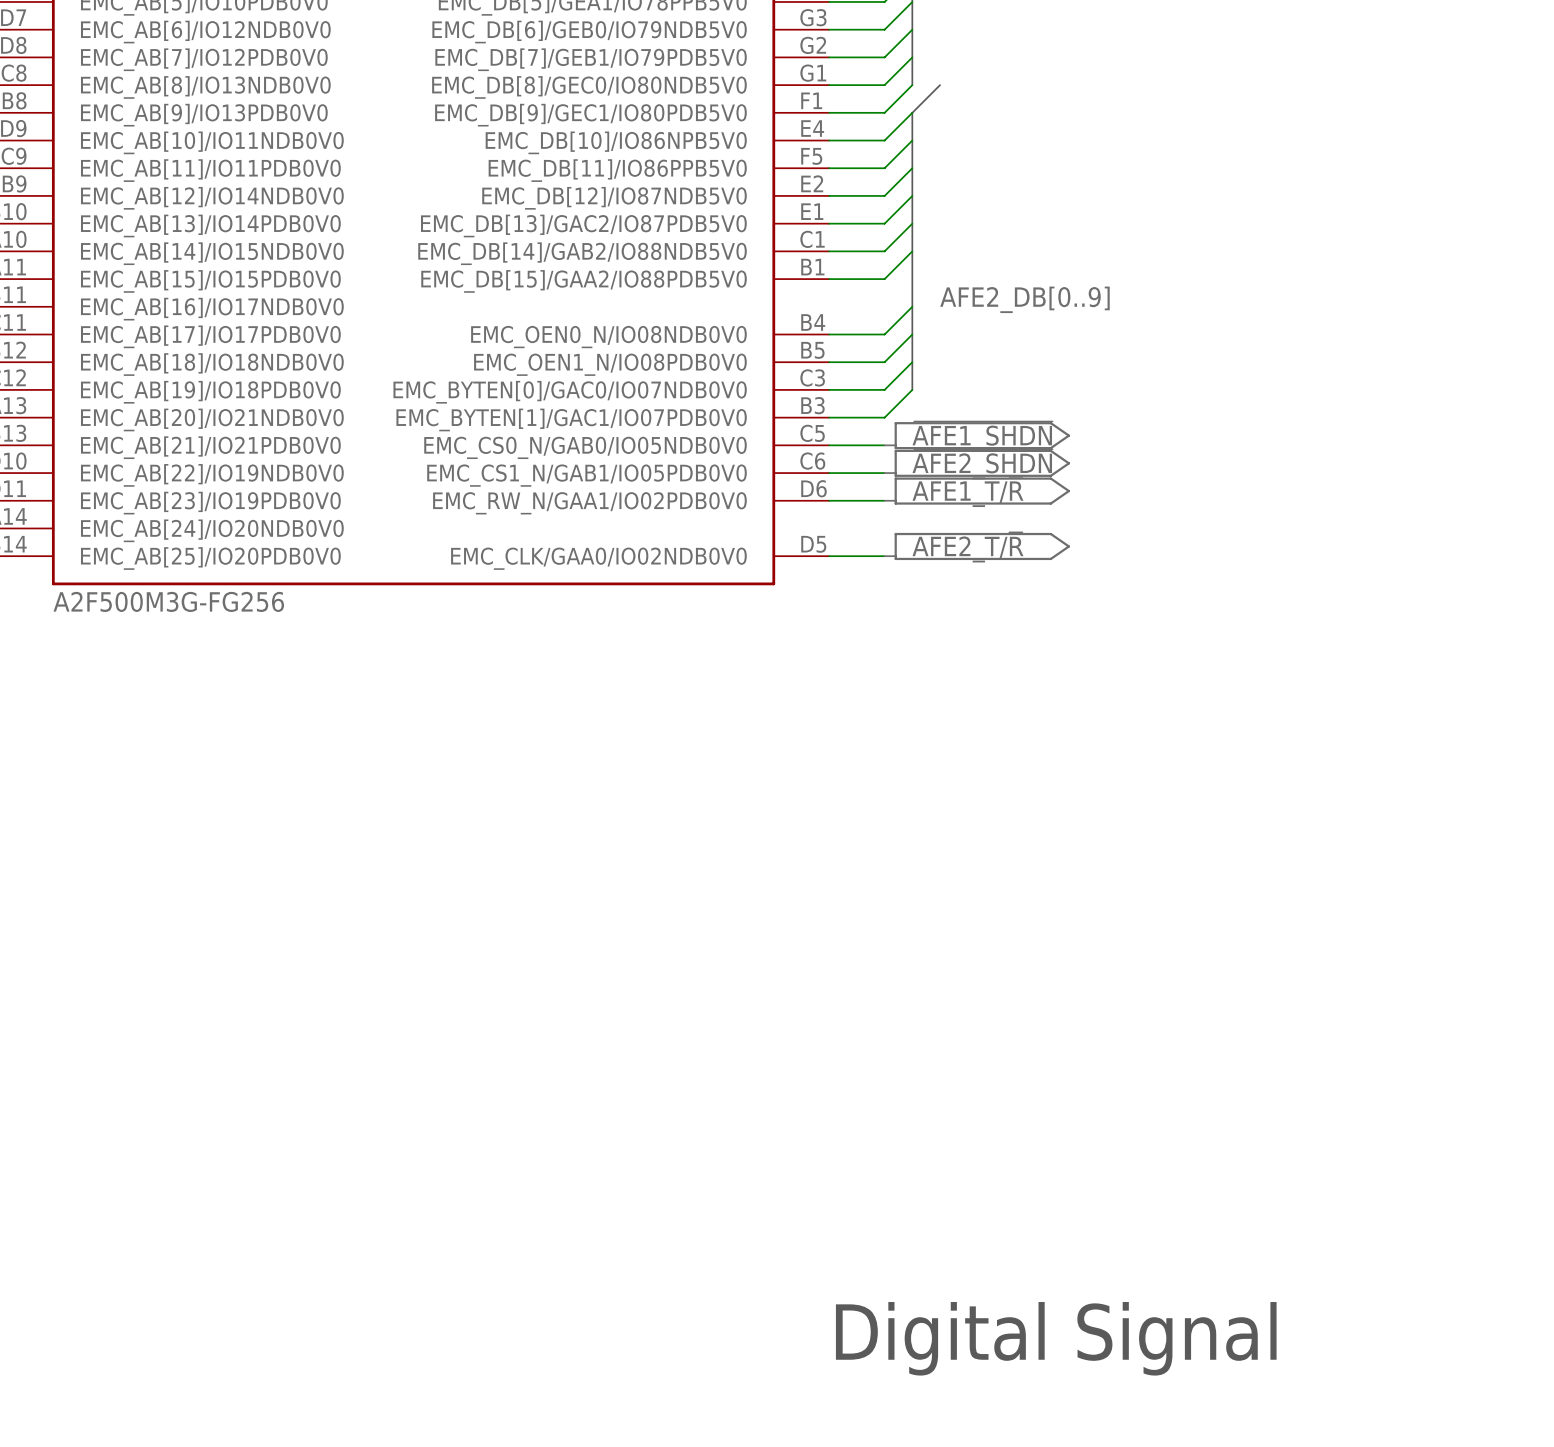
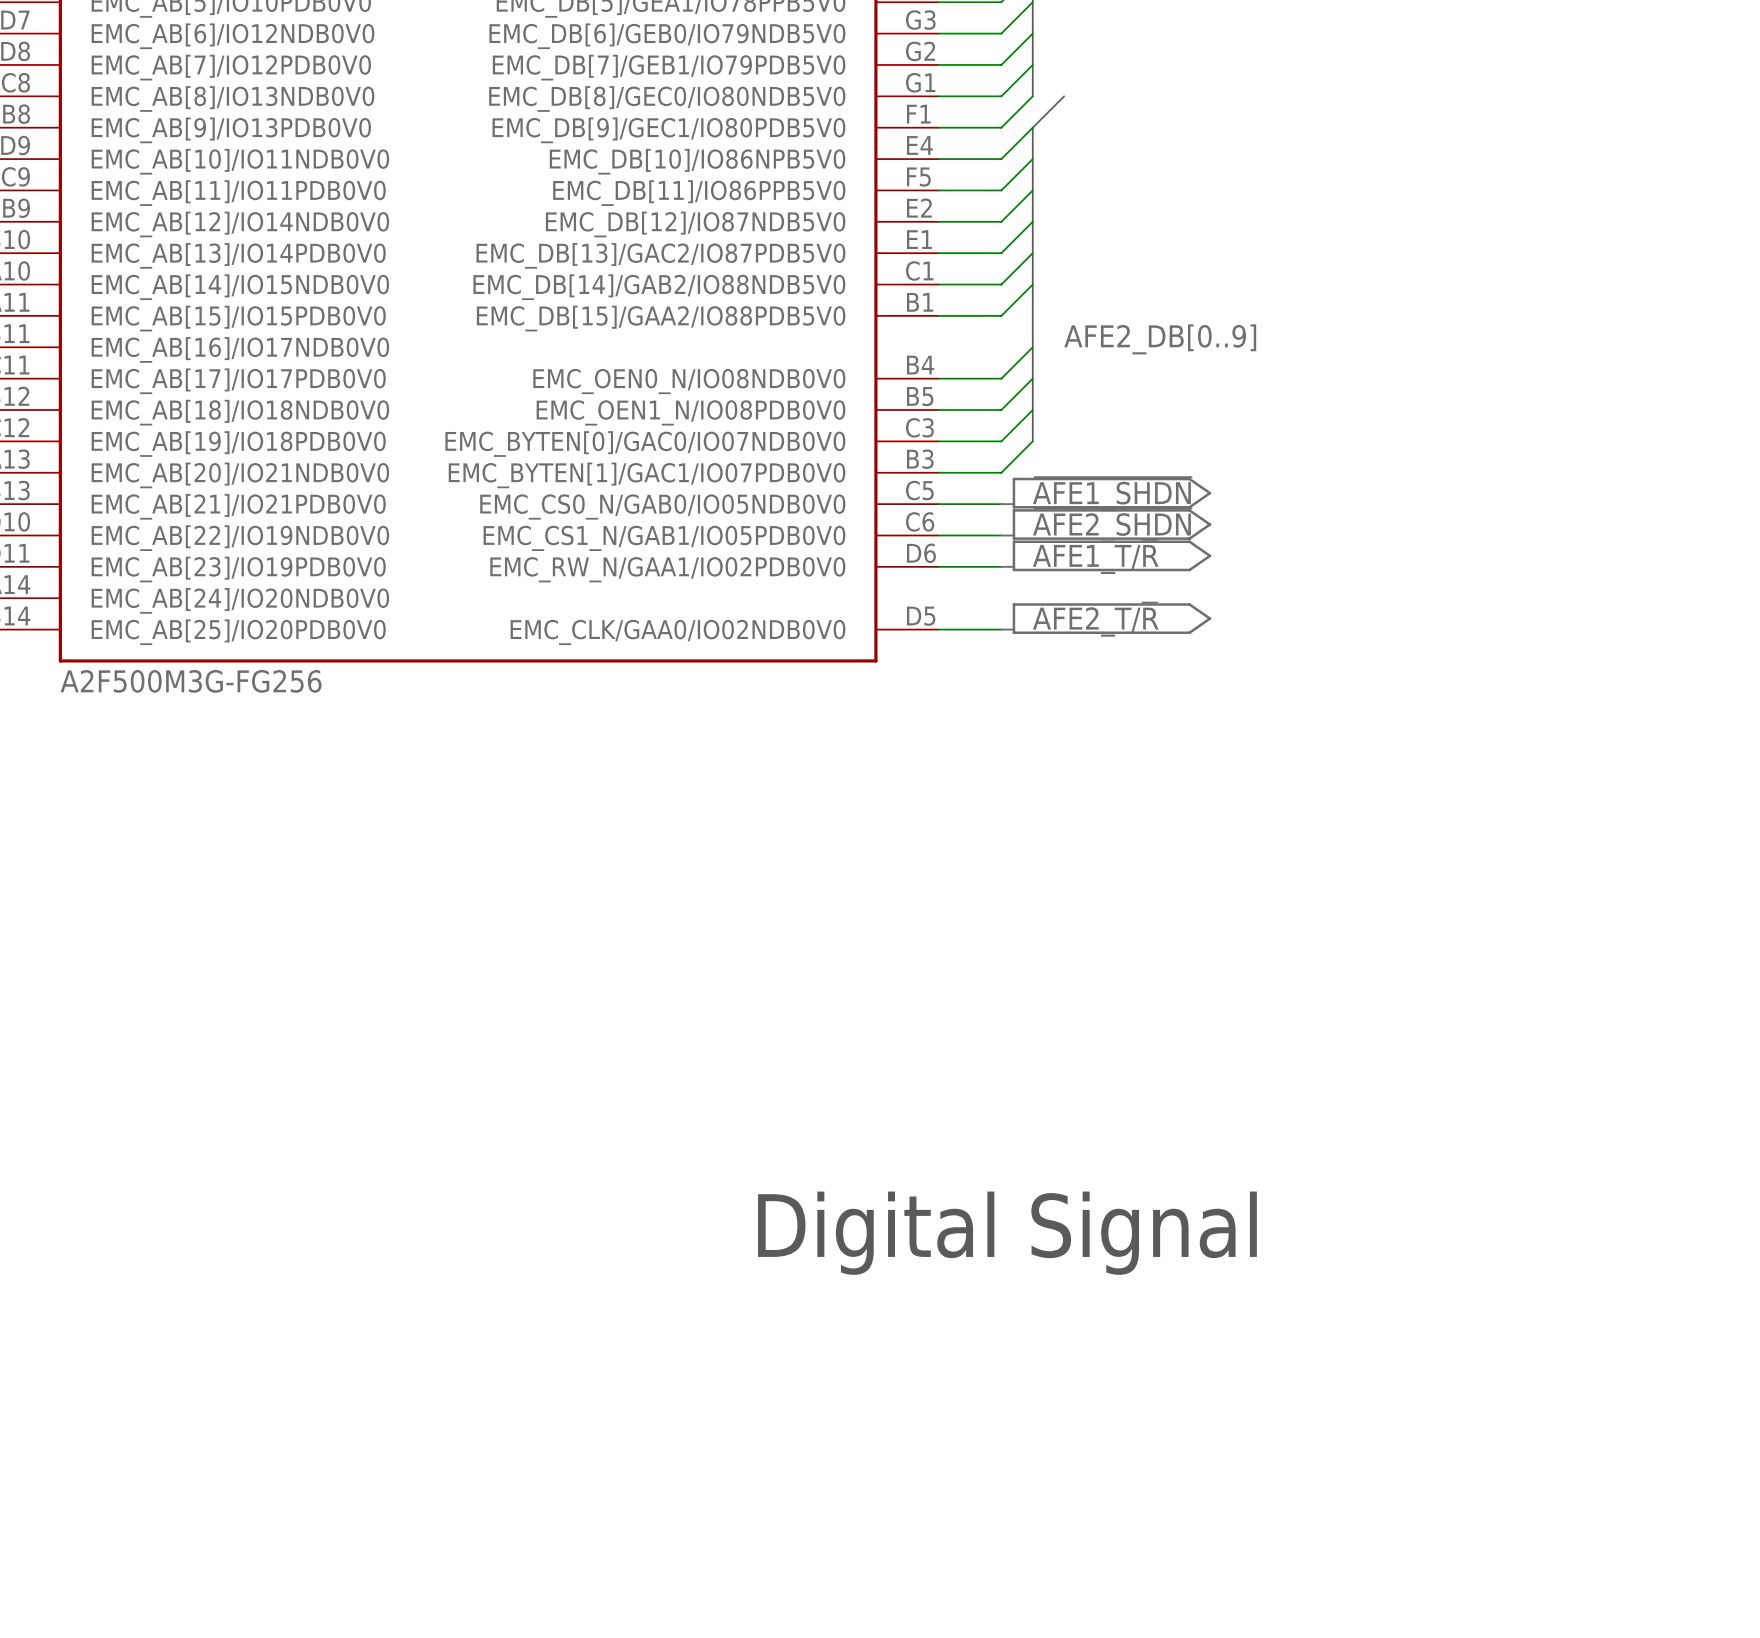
text: none -> Digital Signal (1007, 1233)
text: Digital Signal (1056, 1338) -> none

